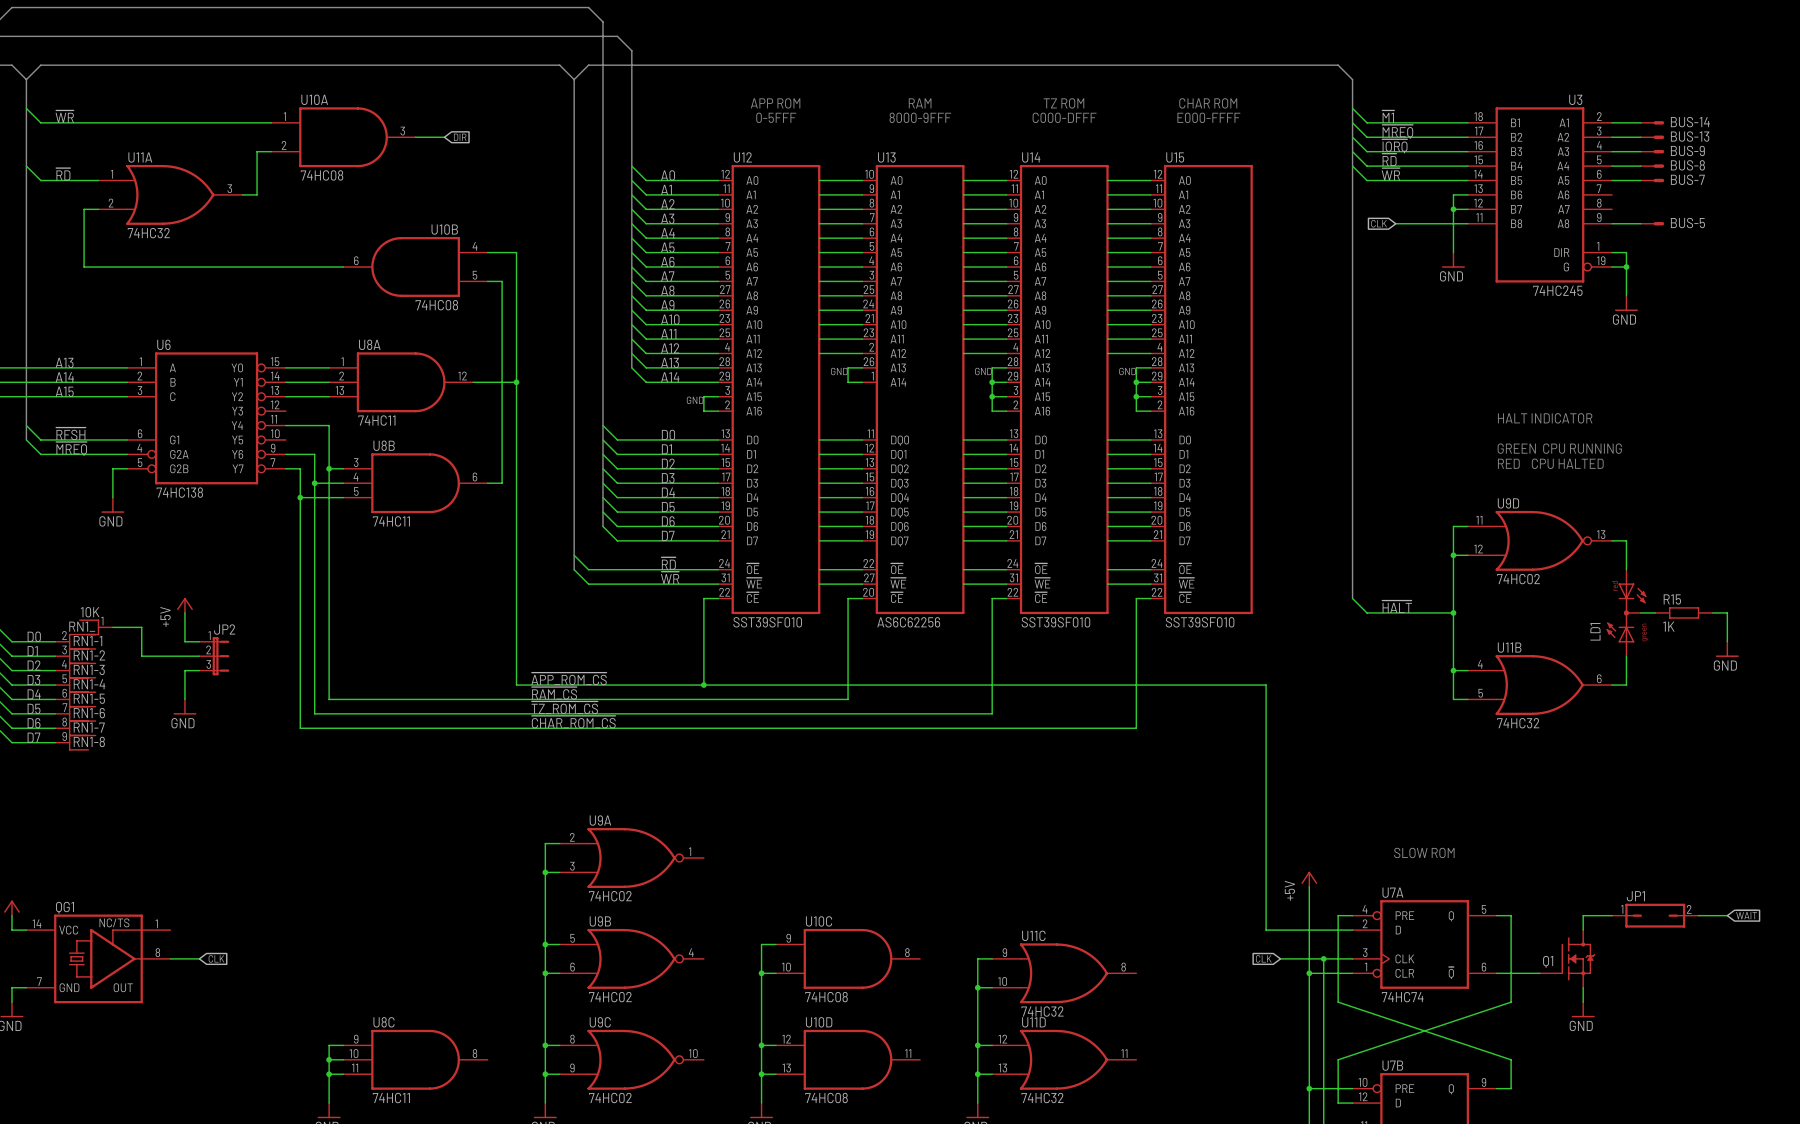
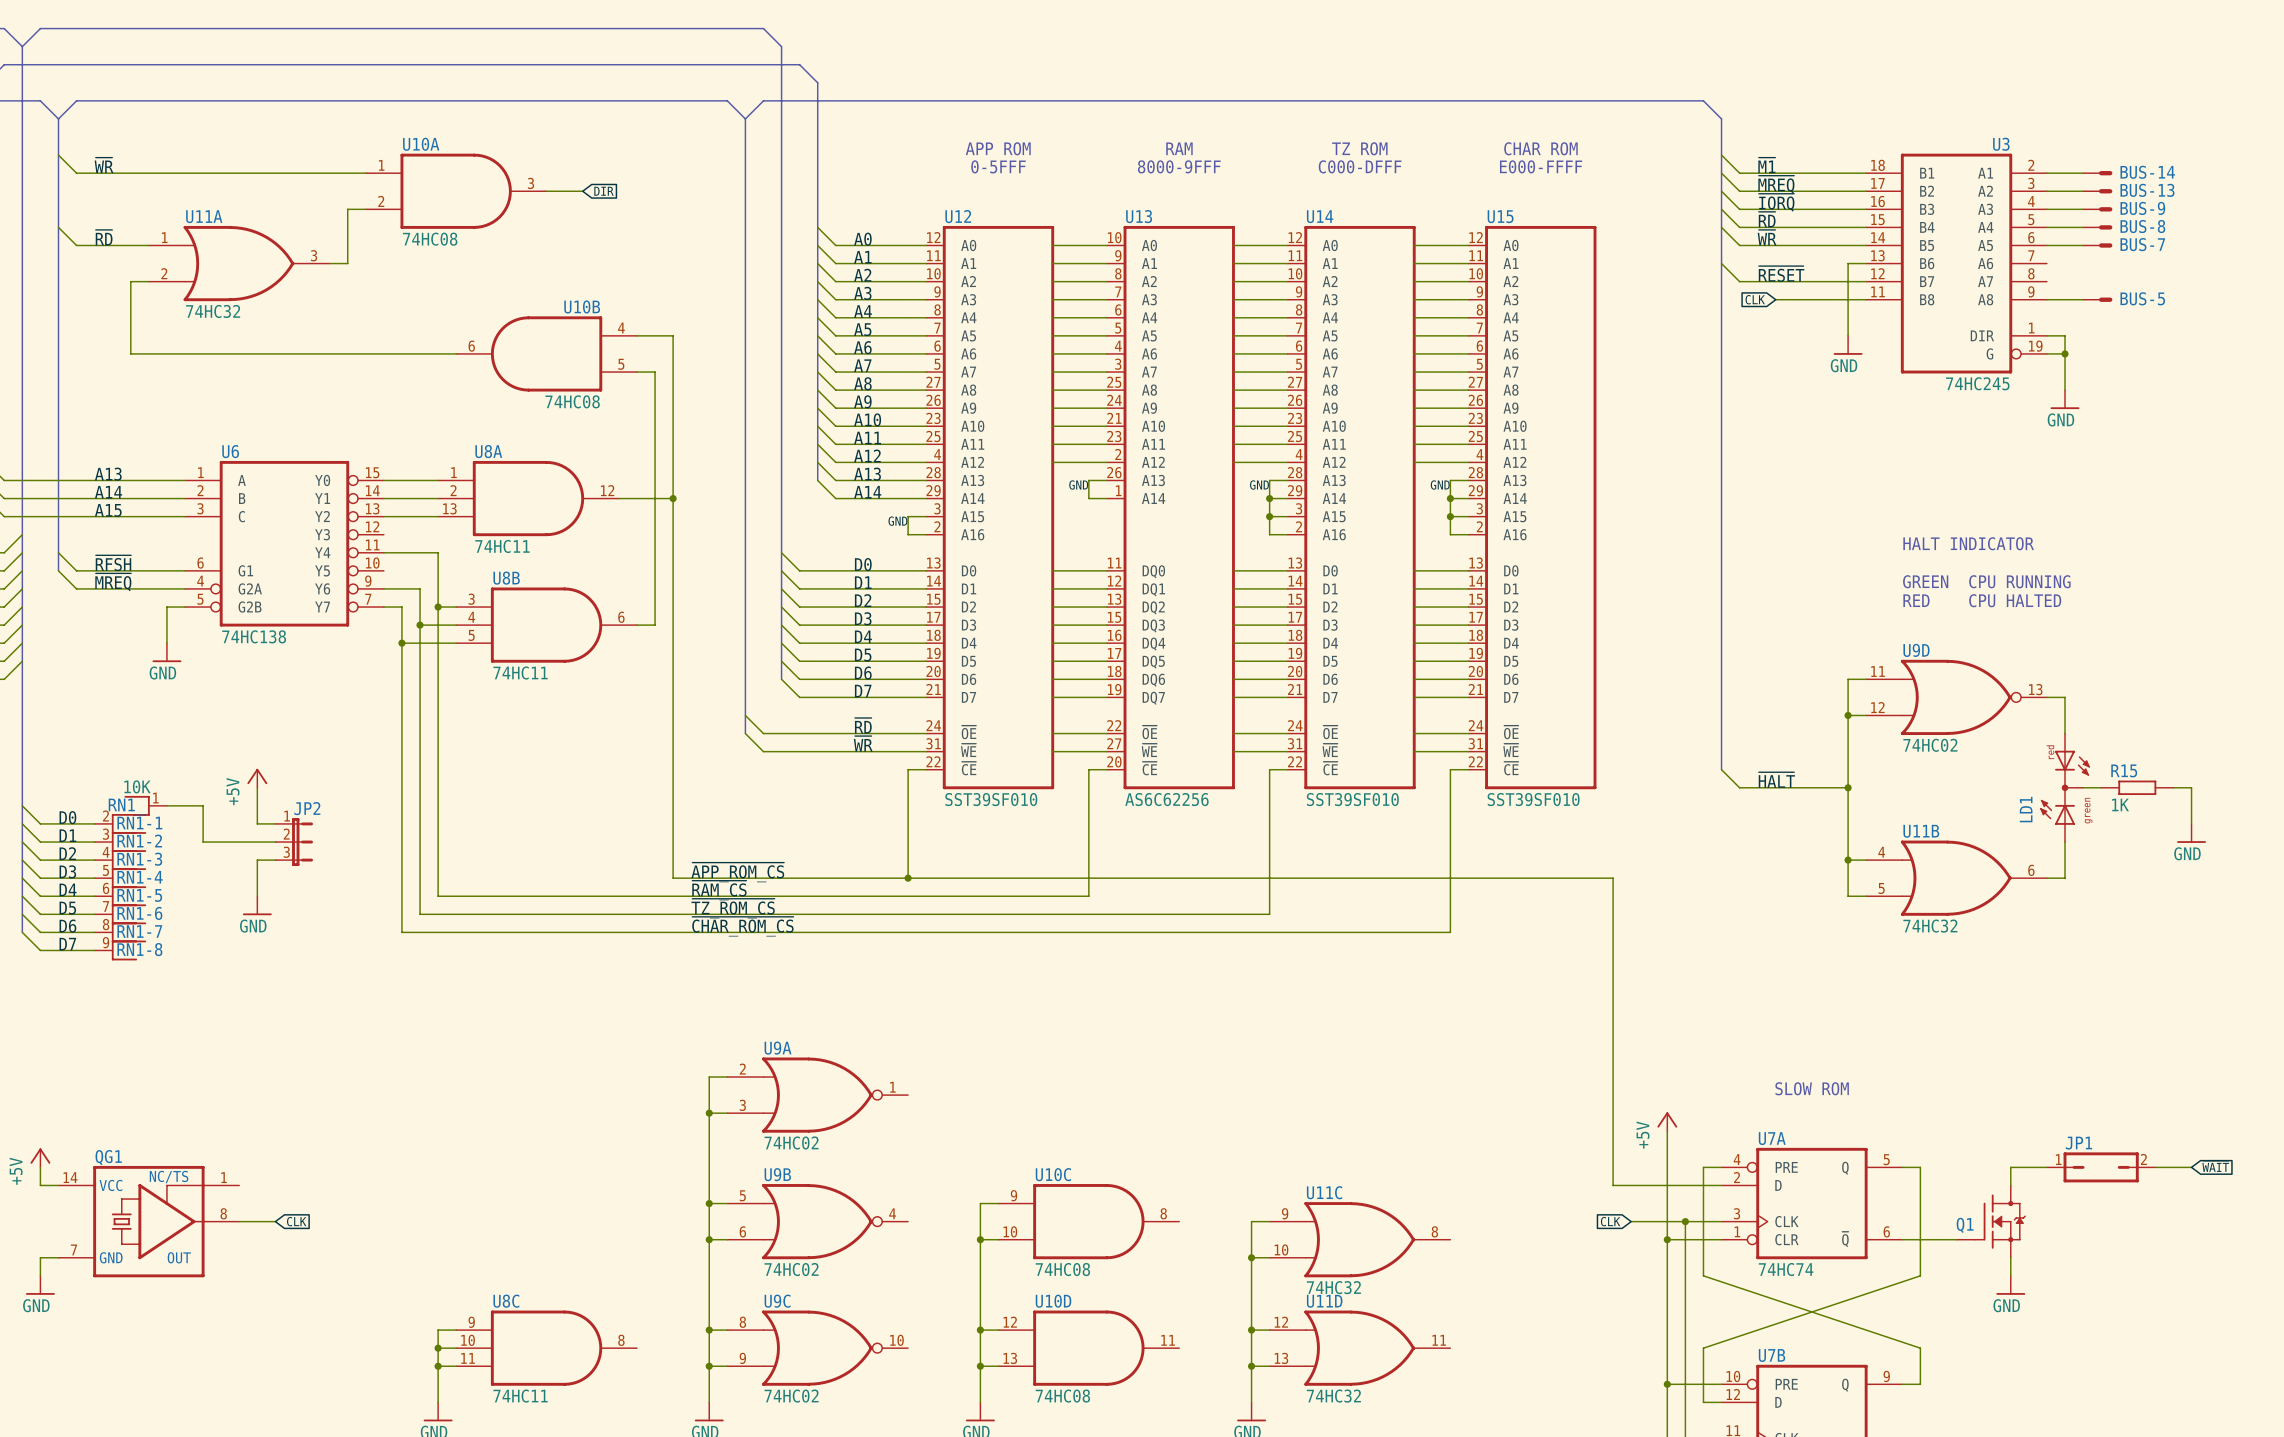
wire: none -> (1721, 263) (1739, 281) (1848, 281)
label: none -> ~{RESET} (1781, 273)
junction: (1453, 209) -> none

